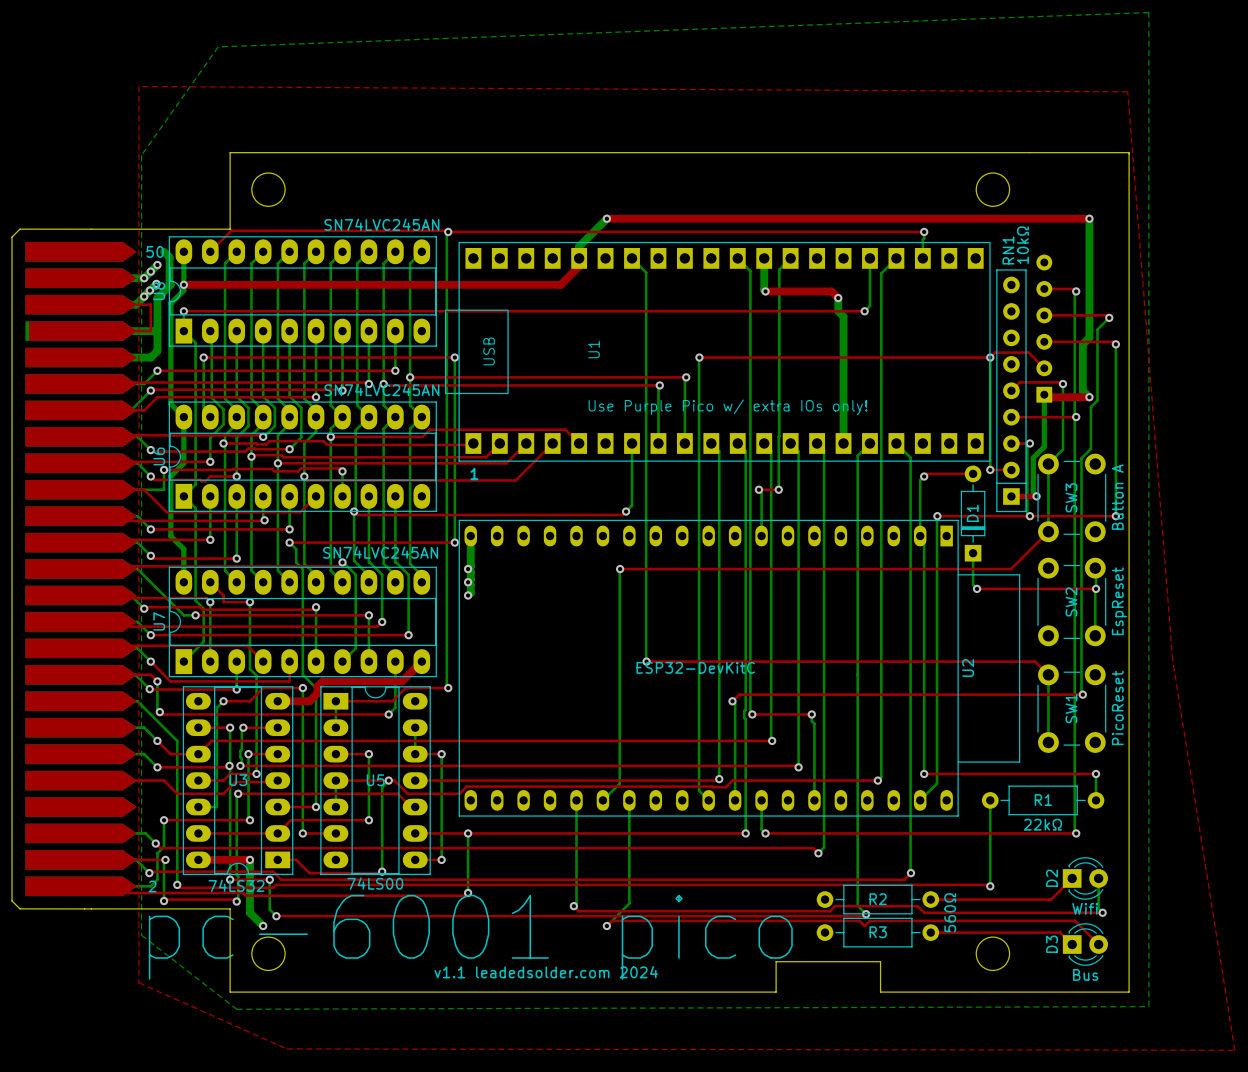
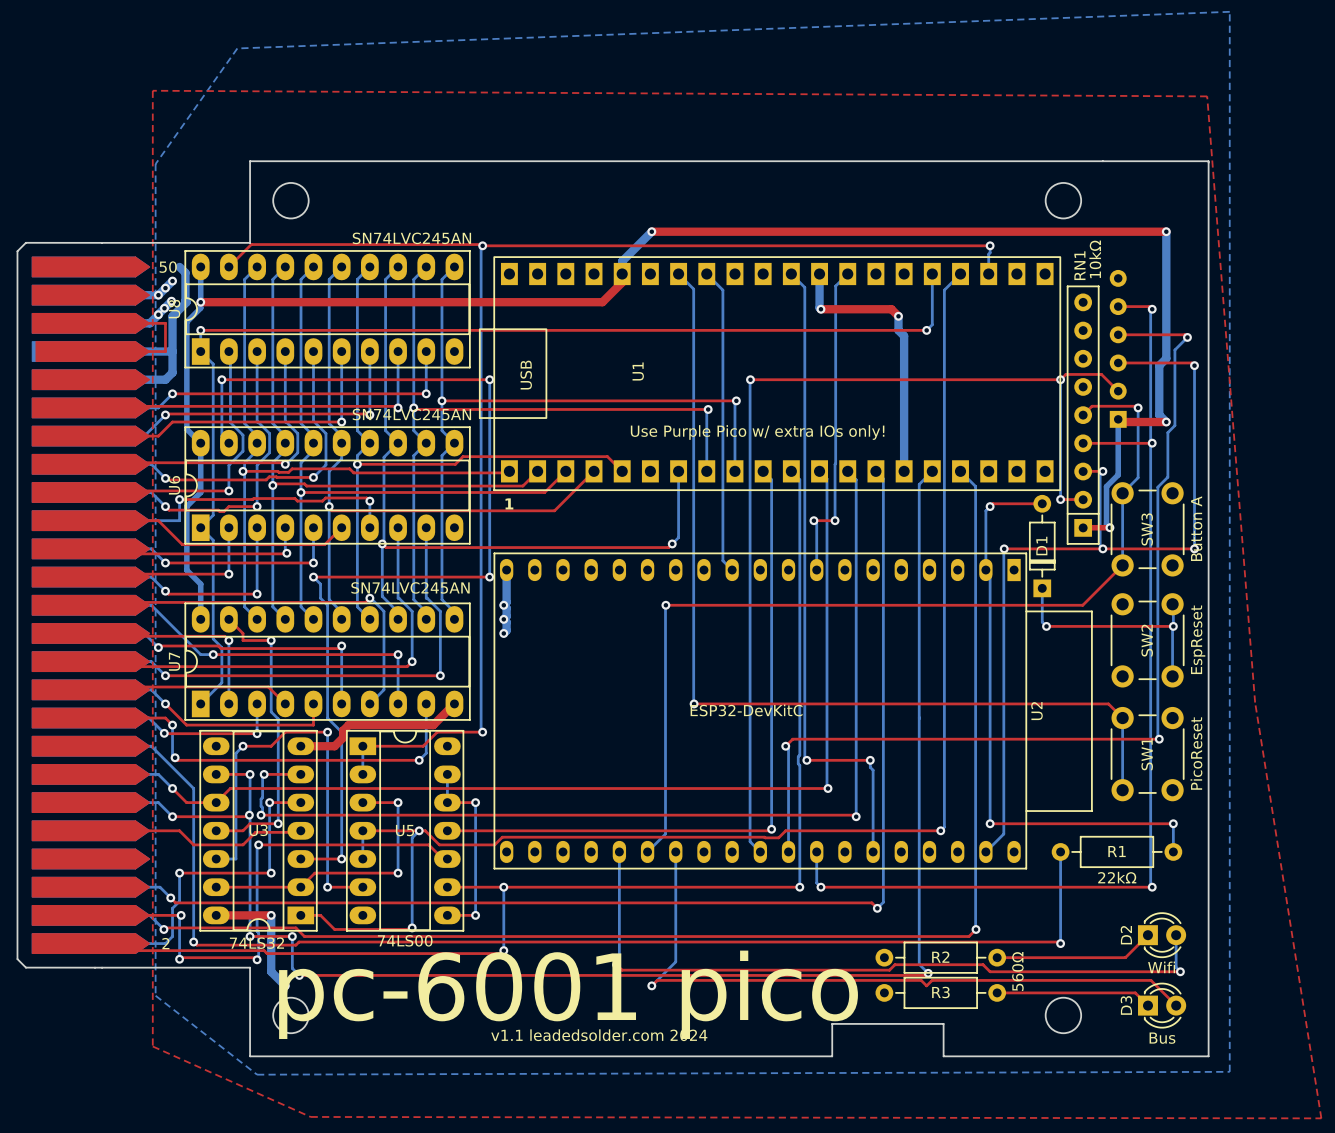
bottom track: none -> (706, 274) (722, 290) (722, 560) (732, 570)

